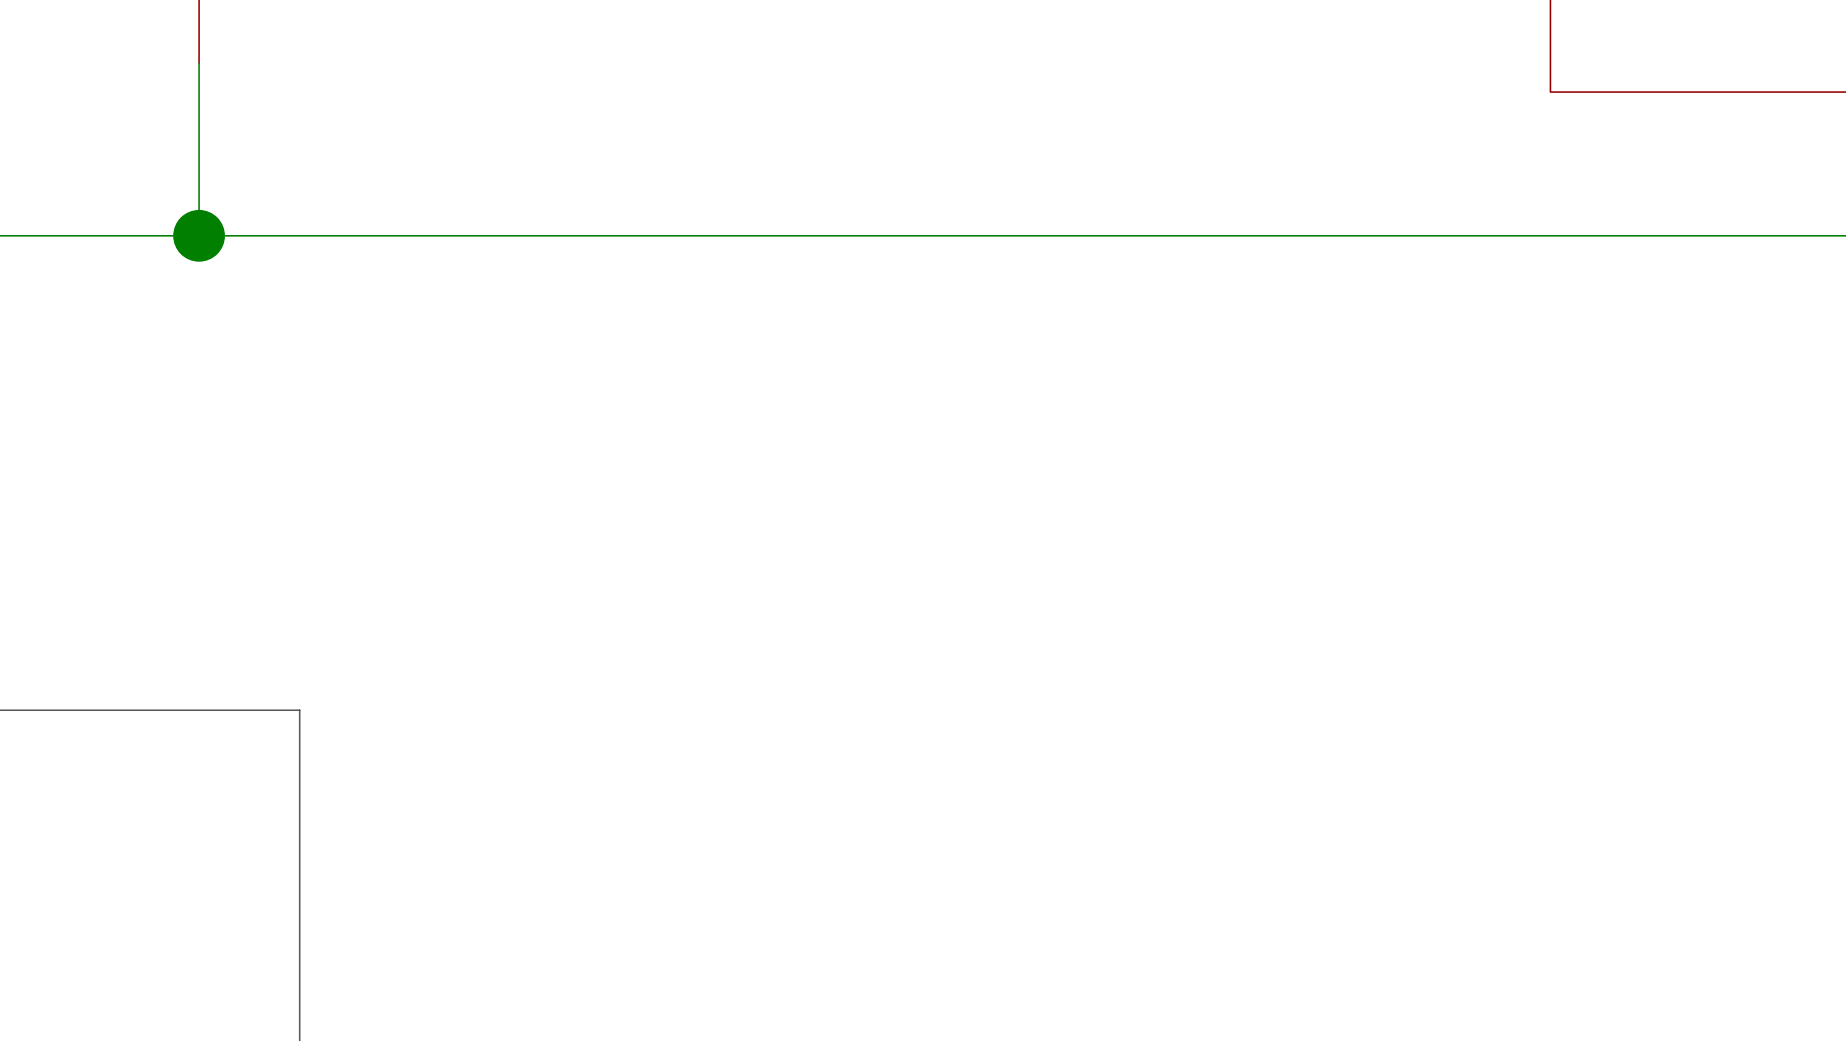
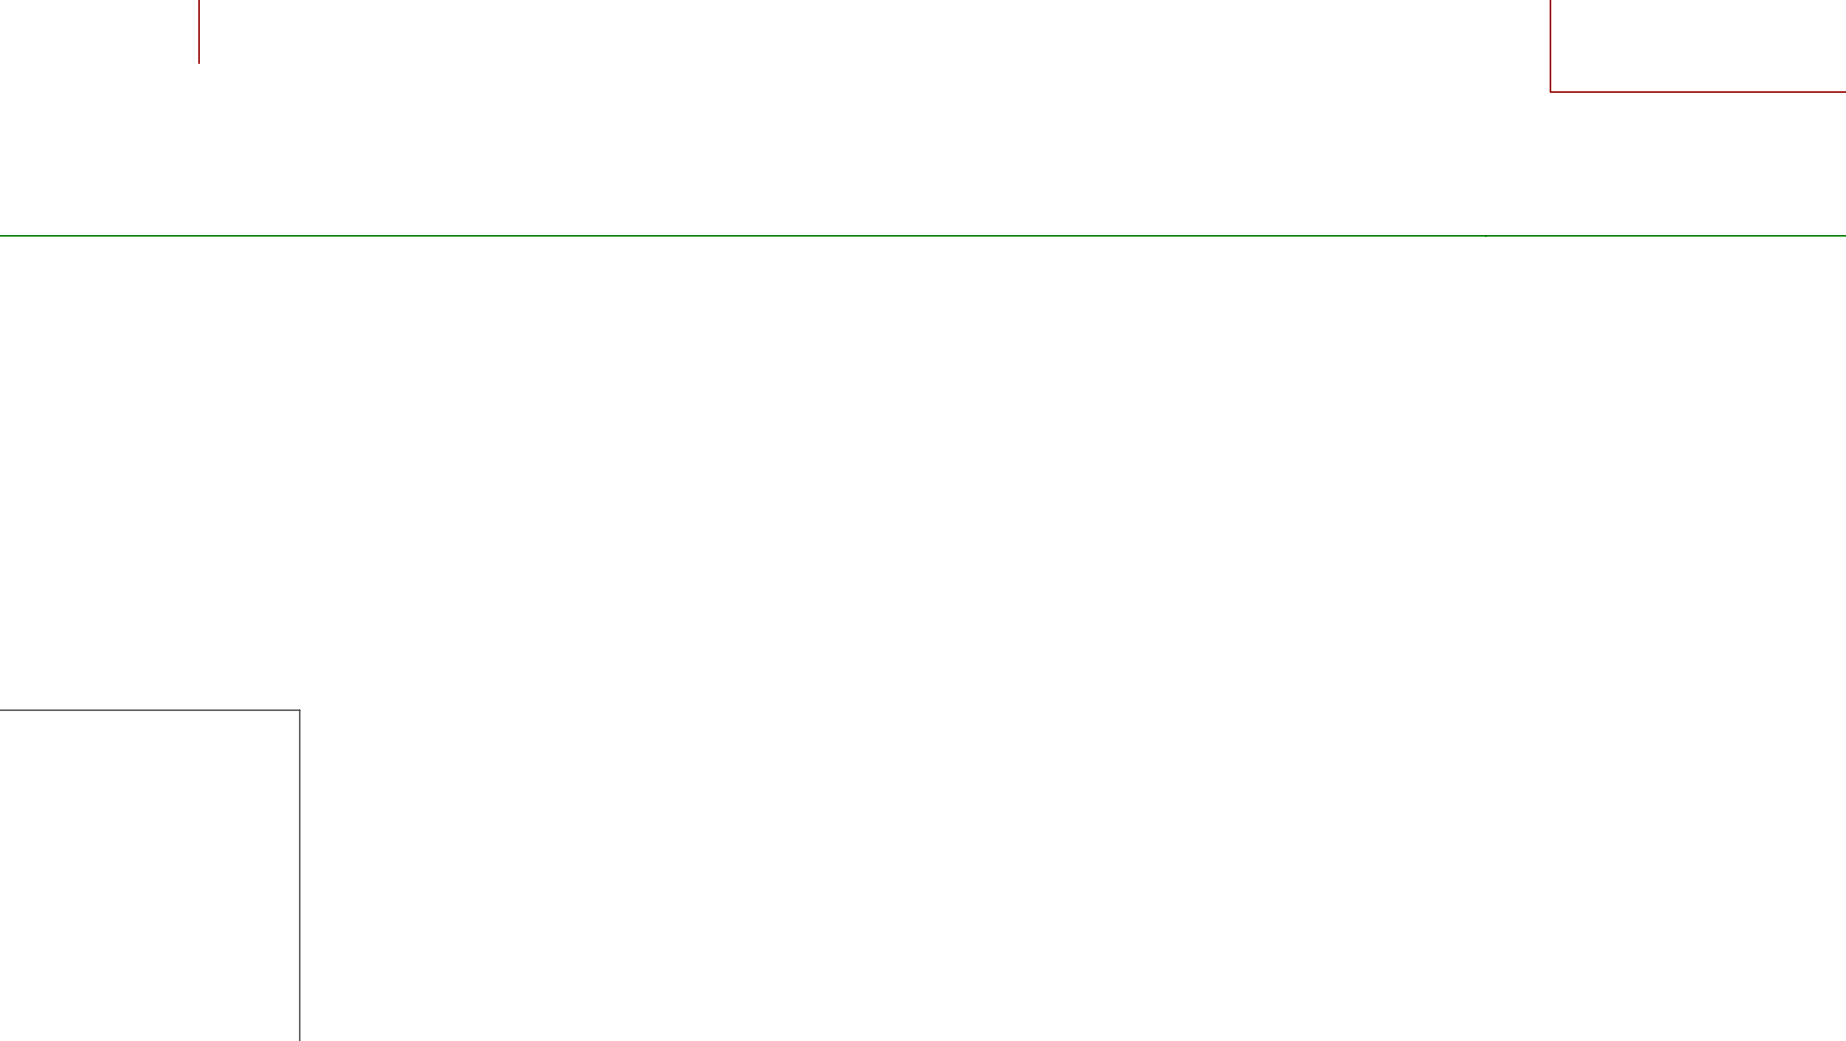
wire: (199, 63) (199, 235) -> none
junction: (199, 235) -> none

